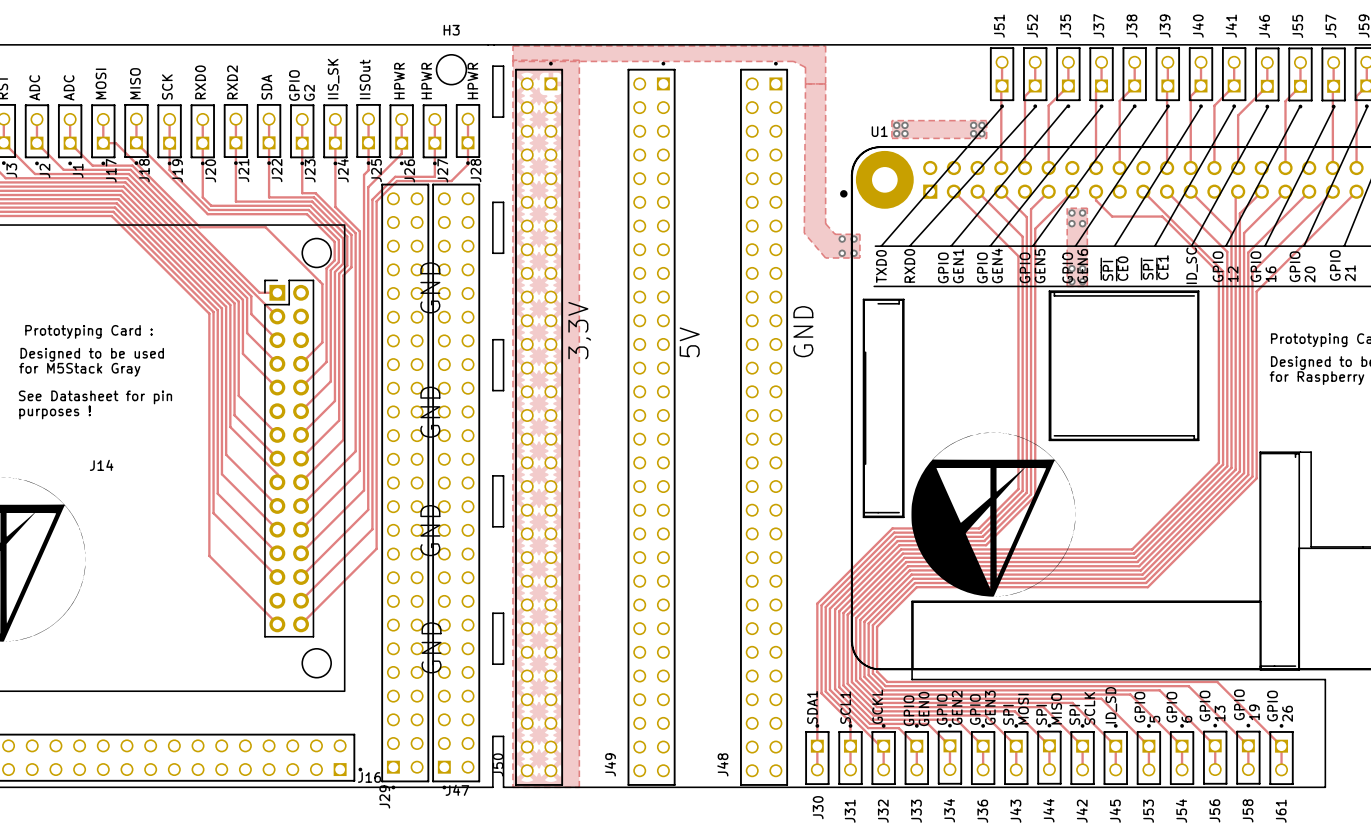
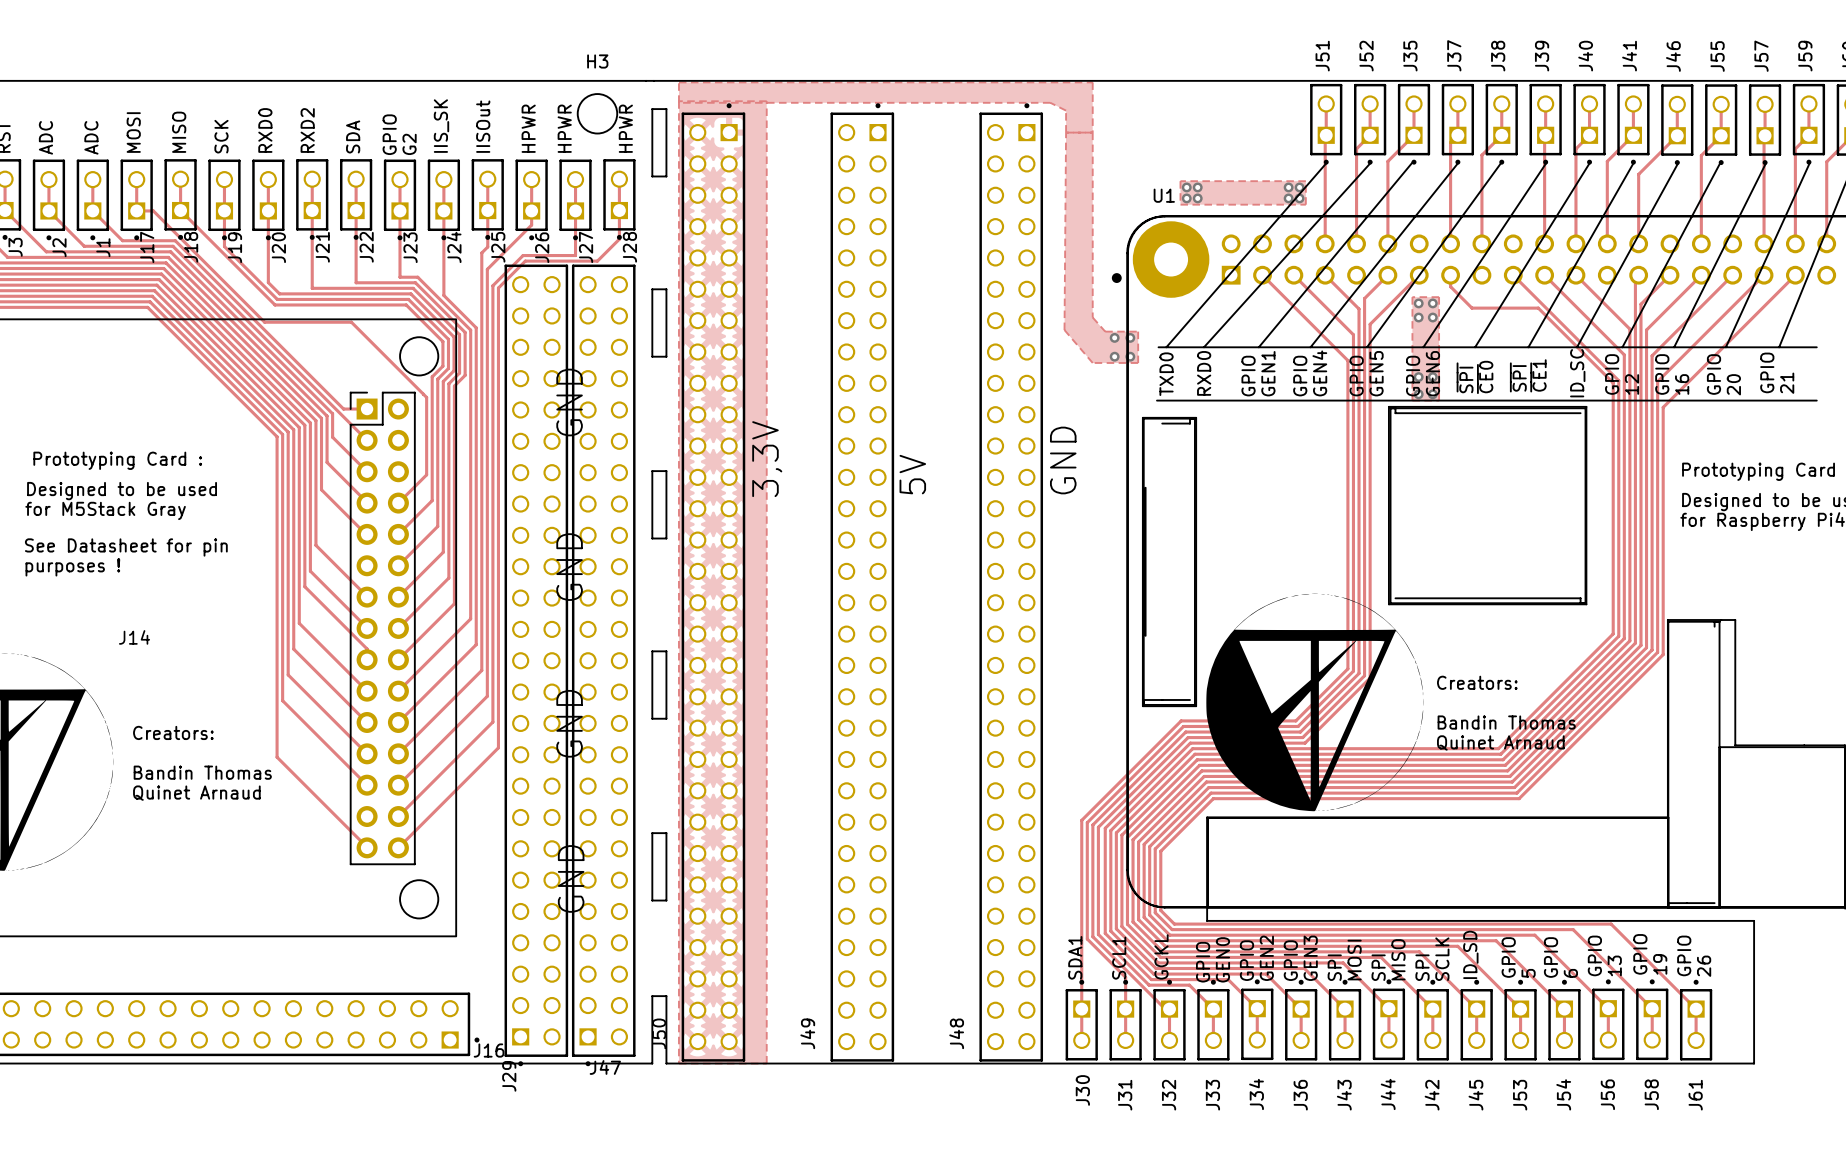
text: none -> Creators: (1477, 682)
text: none -> Bandin Thomas (1506, 722)
text: none -> Creators: (173, 732)
text: none -> Quinet Arnaud (1500, 742)
text: none -> Bandin Thomas (202, 772)
text: none -> Quinet Arnaud (196, 793)

